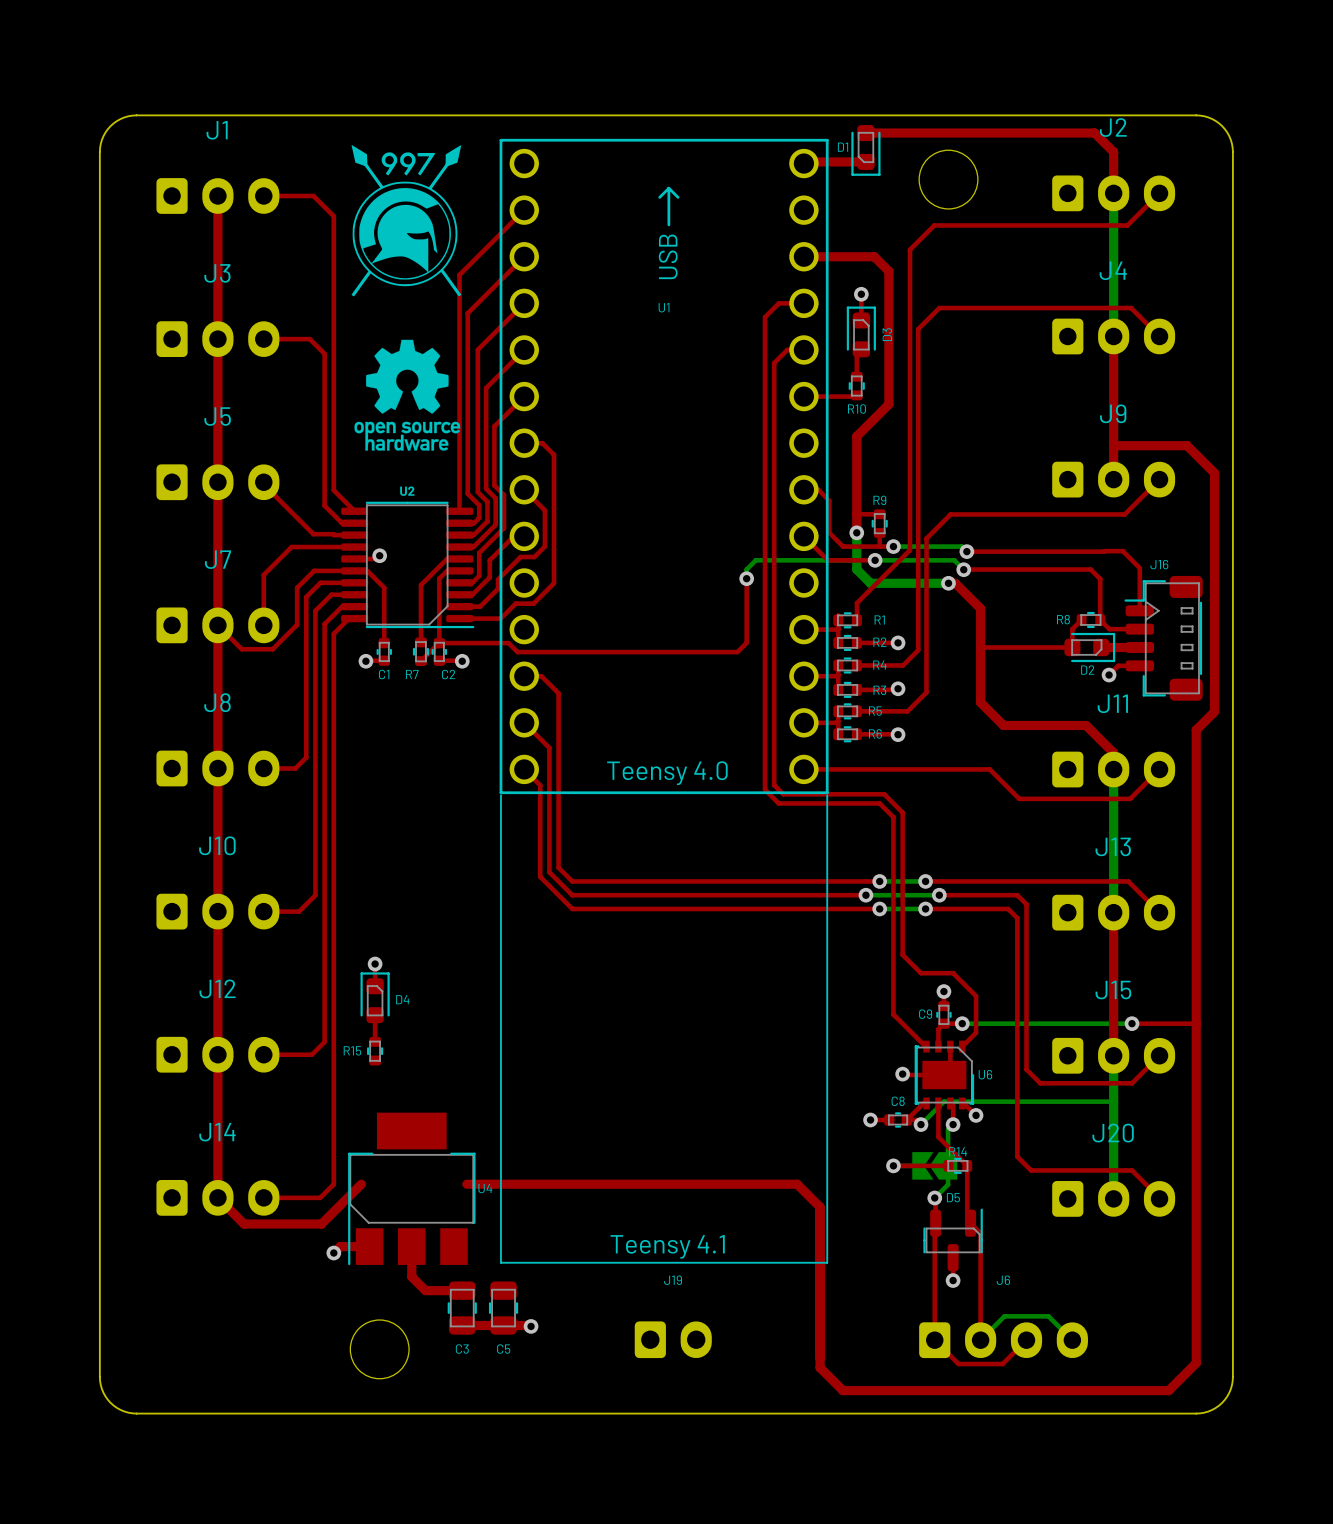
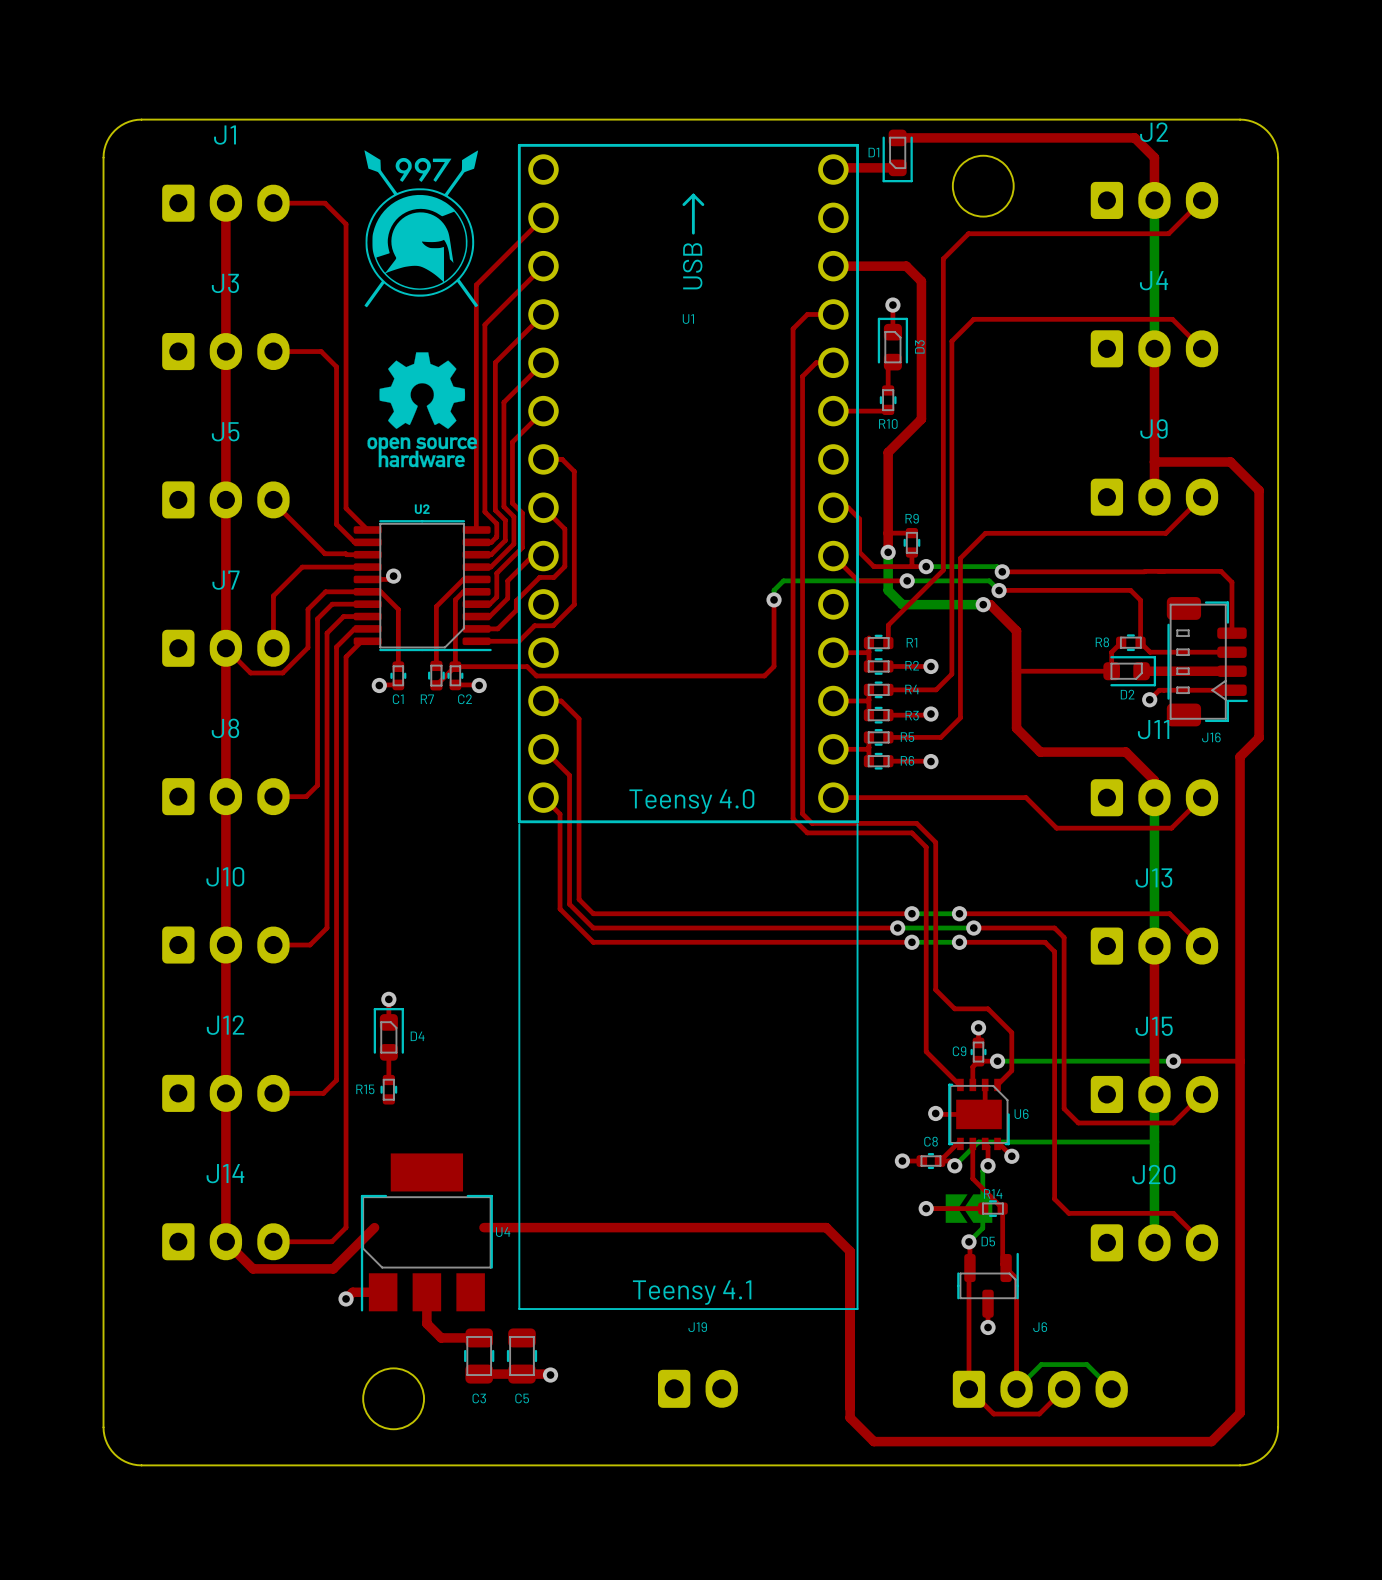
top track: (1122, 551) (1139, 568) (1139, 610) -> (1163, 571) (1221, 571) (1231, 582) (1231, 633)
top track: none -> (1181, 652) (1231, 652)
J16 rotation: 0° (1163, 638) -> 180° (1207, 661)
top track: none -> (1181, 671) (1231, 671)
top track: none -> (1181, 690) (1231, 690)

